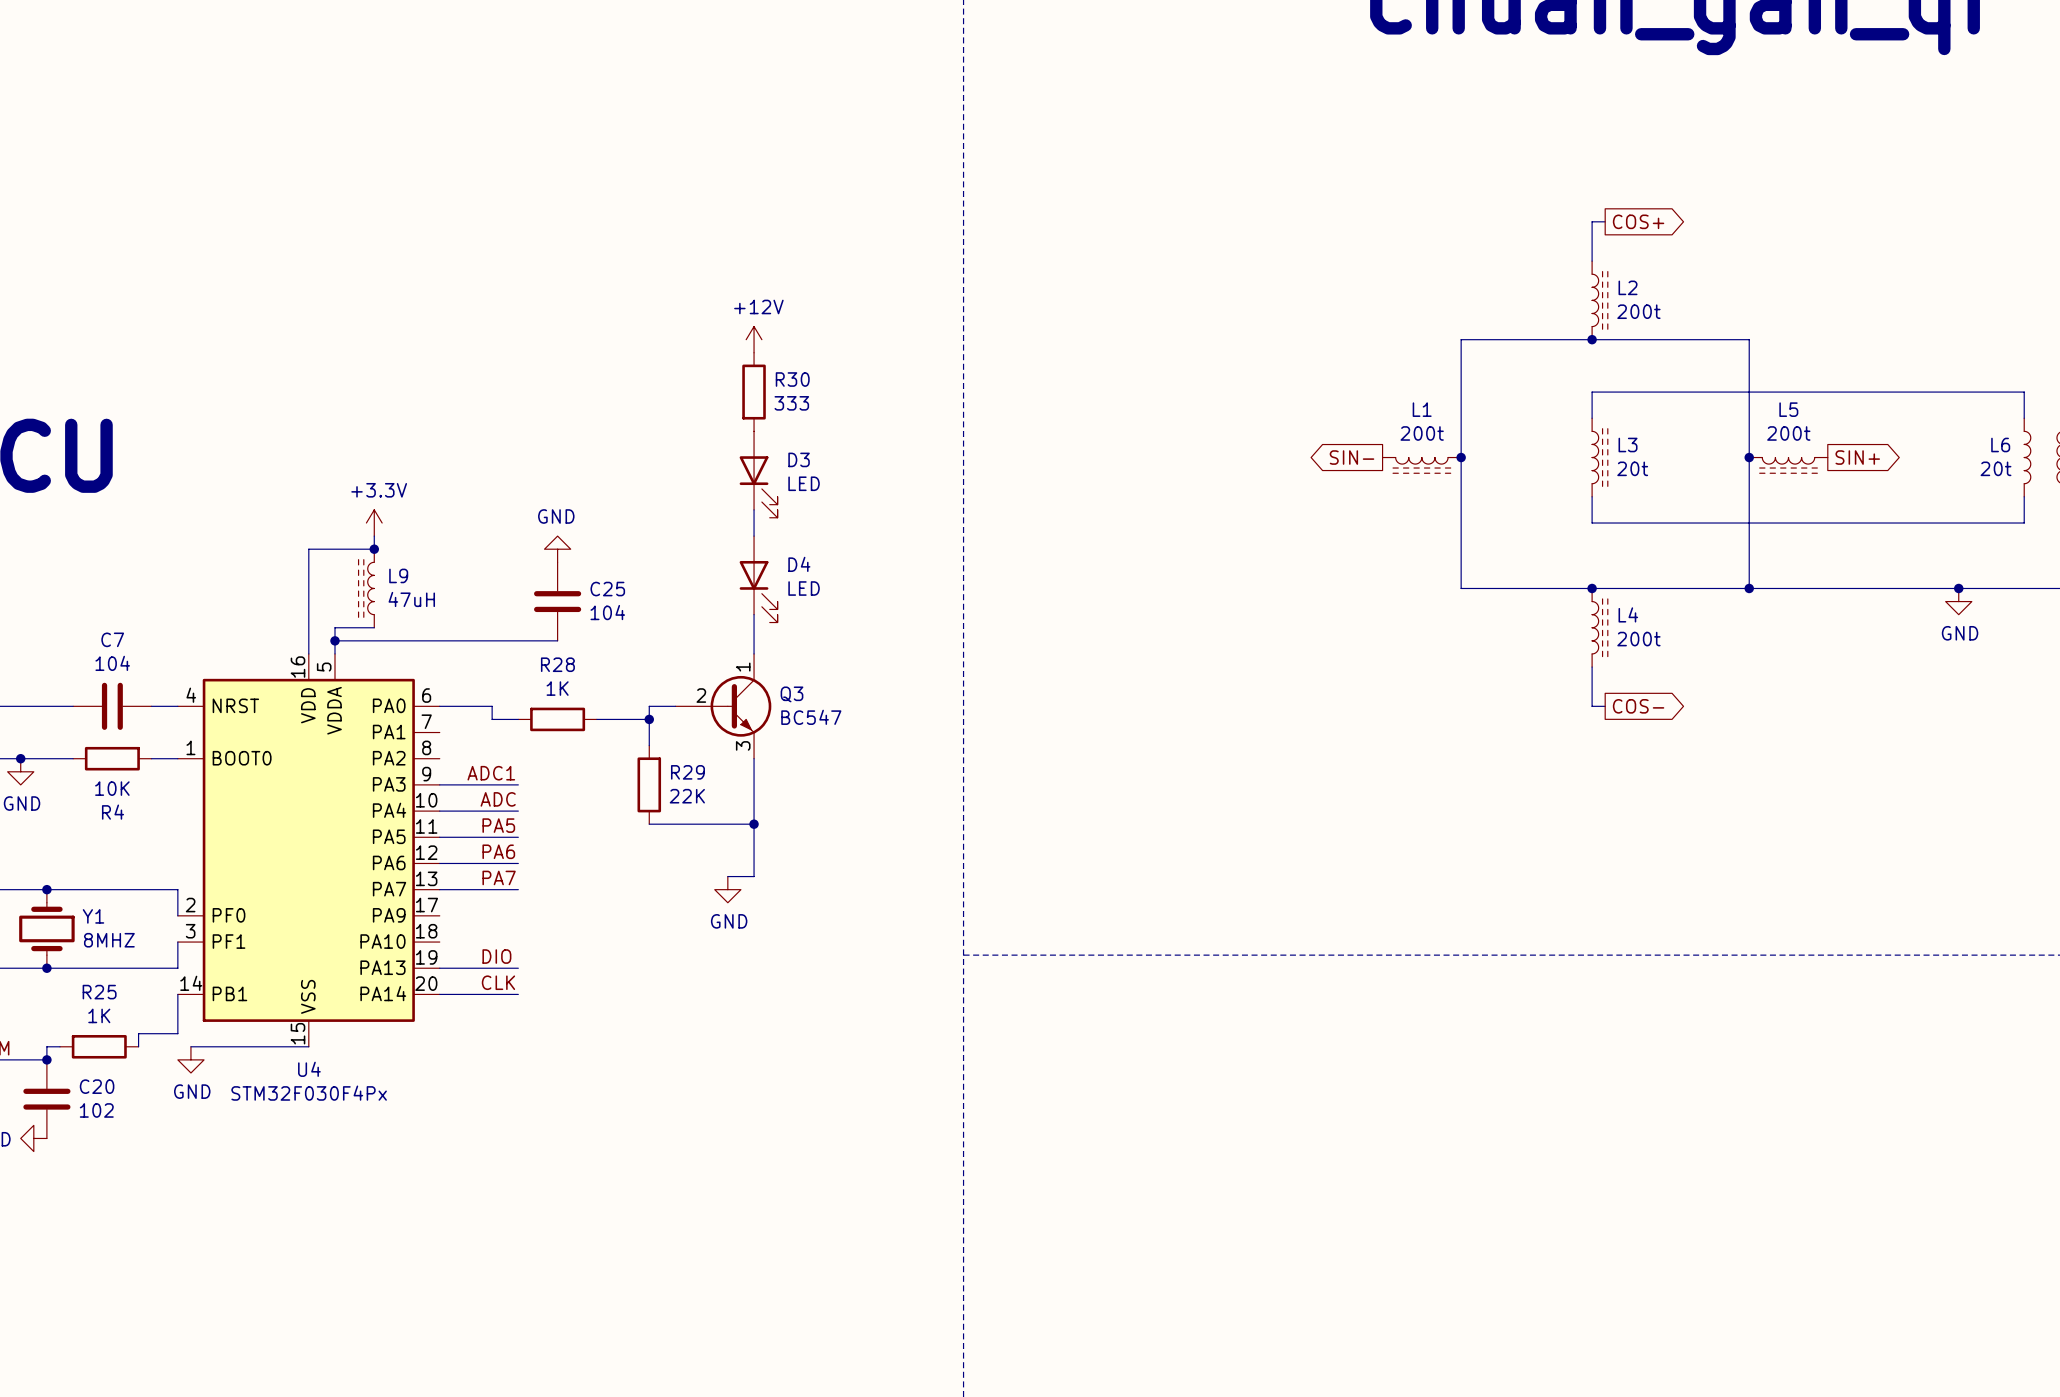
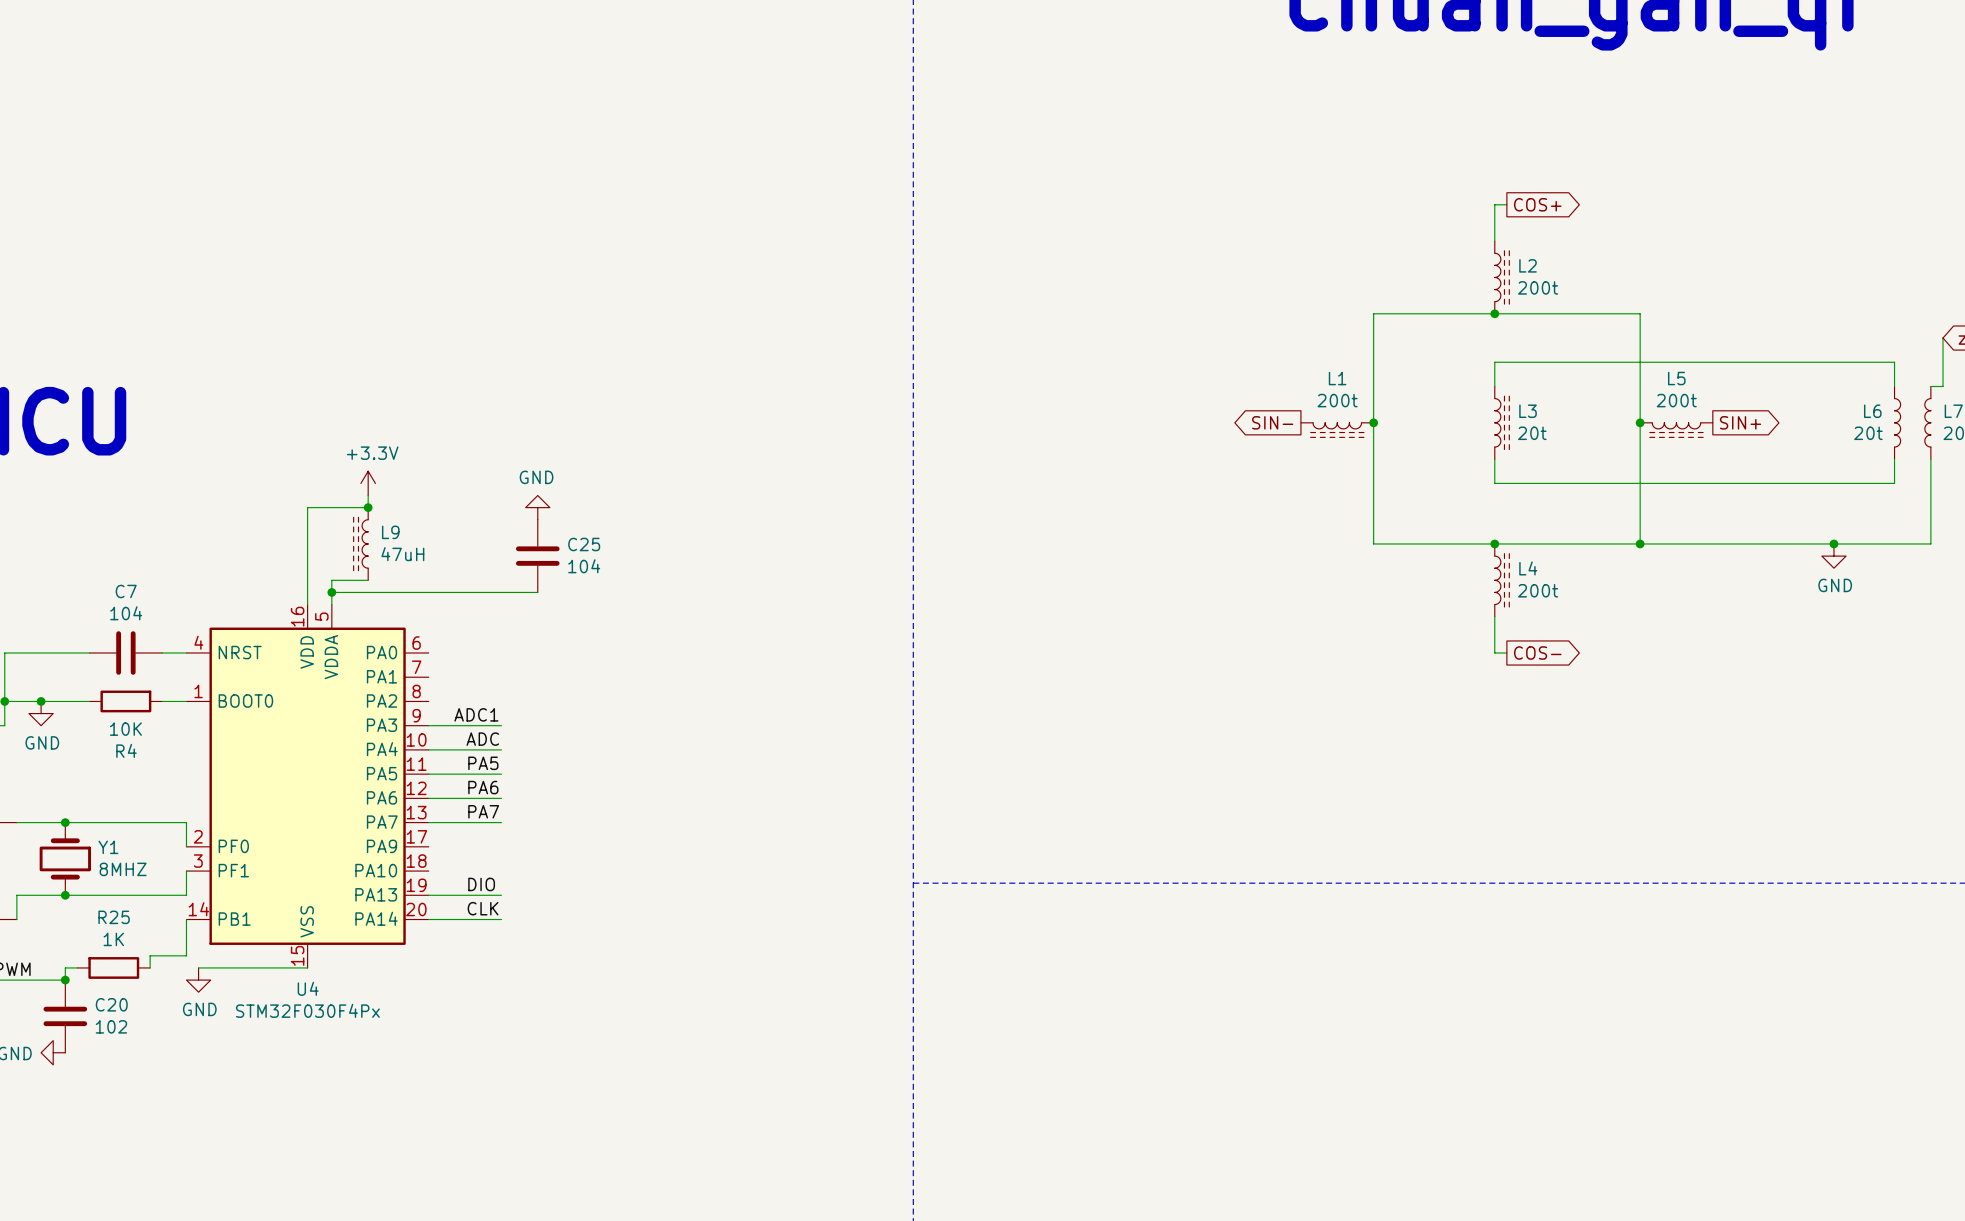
power symbol: +12V (754, 339) -> none
R30: 333 (754, 392) -> none
D3: LED (758, 474) -> none
wire: (754, 509) (754, 536) -> none
D4: LED (758, 579) -> none
wire: (754, 614) (754, 653) -> none
wire: (439, 706) (492, 706) (492, 719) (518, 719) -> none
wire: (675, 706) (649, 706) (649, 745) -> none
Q3: BC547 (723, 706) -> none
R28: 1K (557, 719) -> none
wire: (596, 719) (649, 719) -> none
junction: (649, 719) -> none
wire: (754, 758) (754, 876) (727, 876) -> none
R29: 22K (649, 784) -> none
wire: (649, 824) (754, 824) -> none
junction: (754, 824) -> none
power symbol: GND (727, 889) -> none

